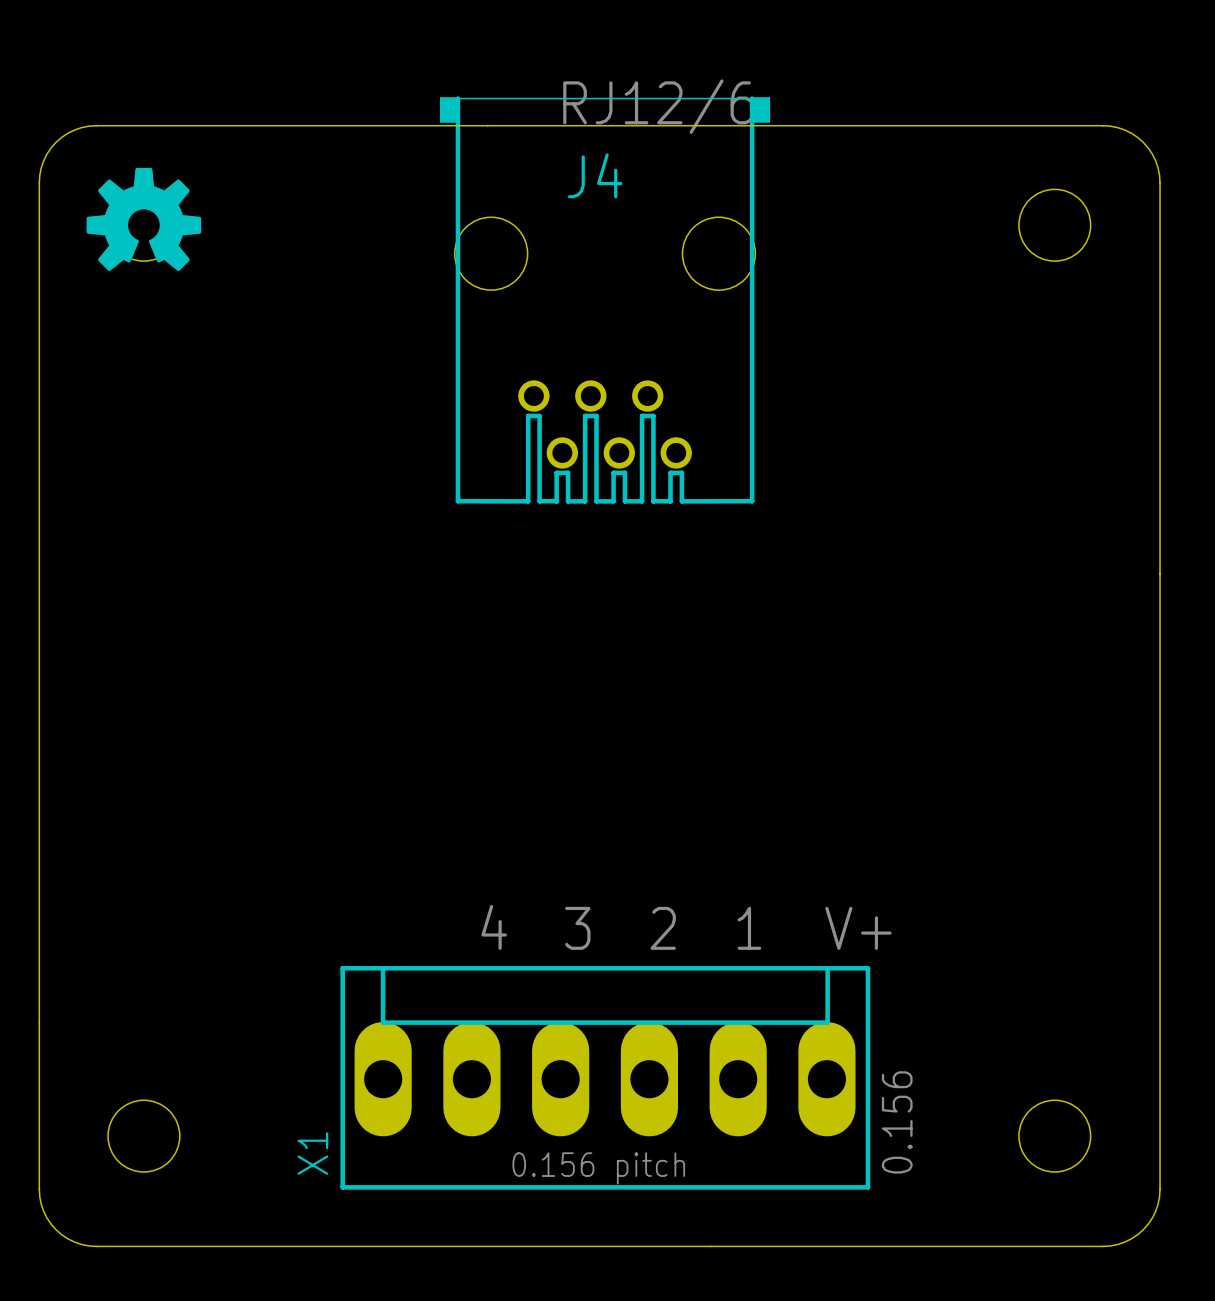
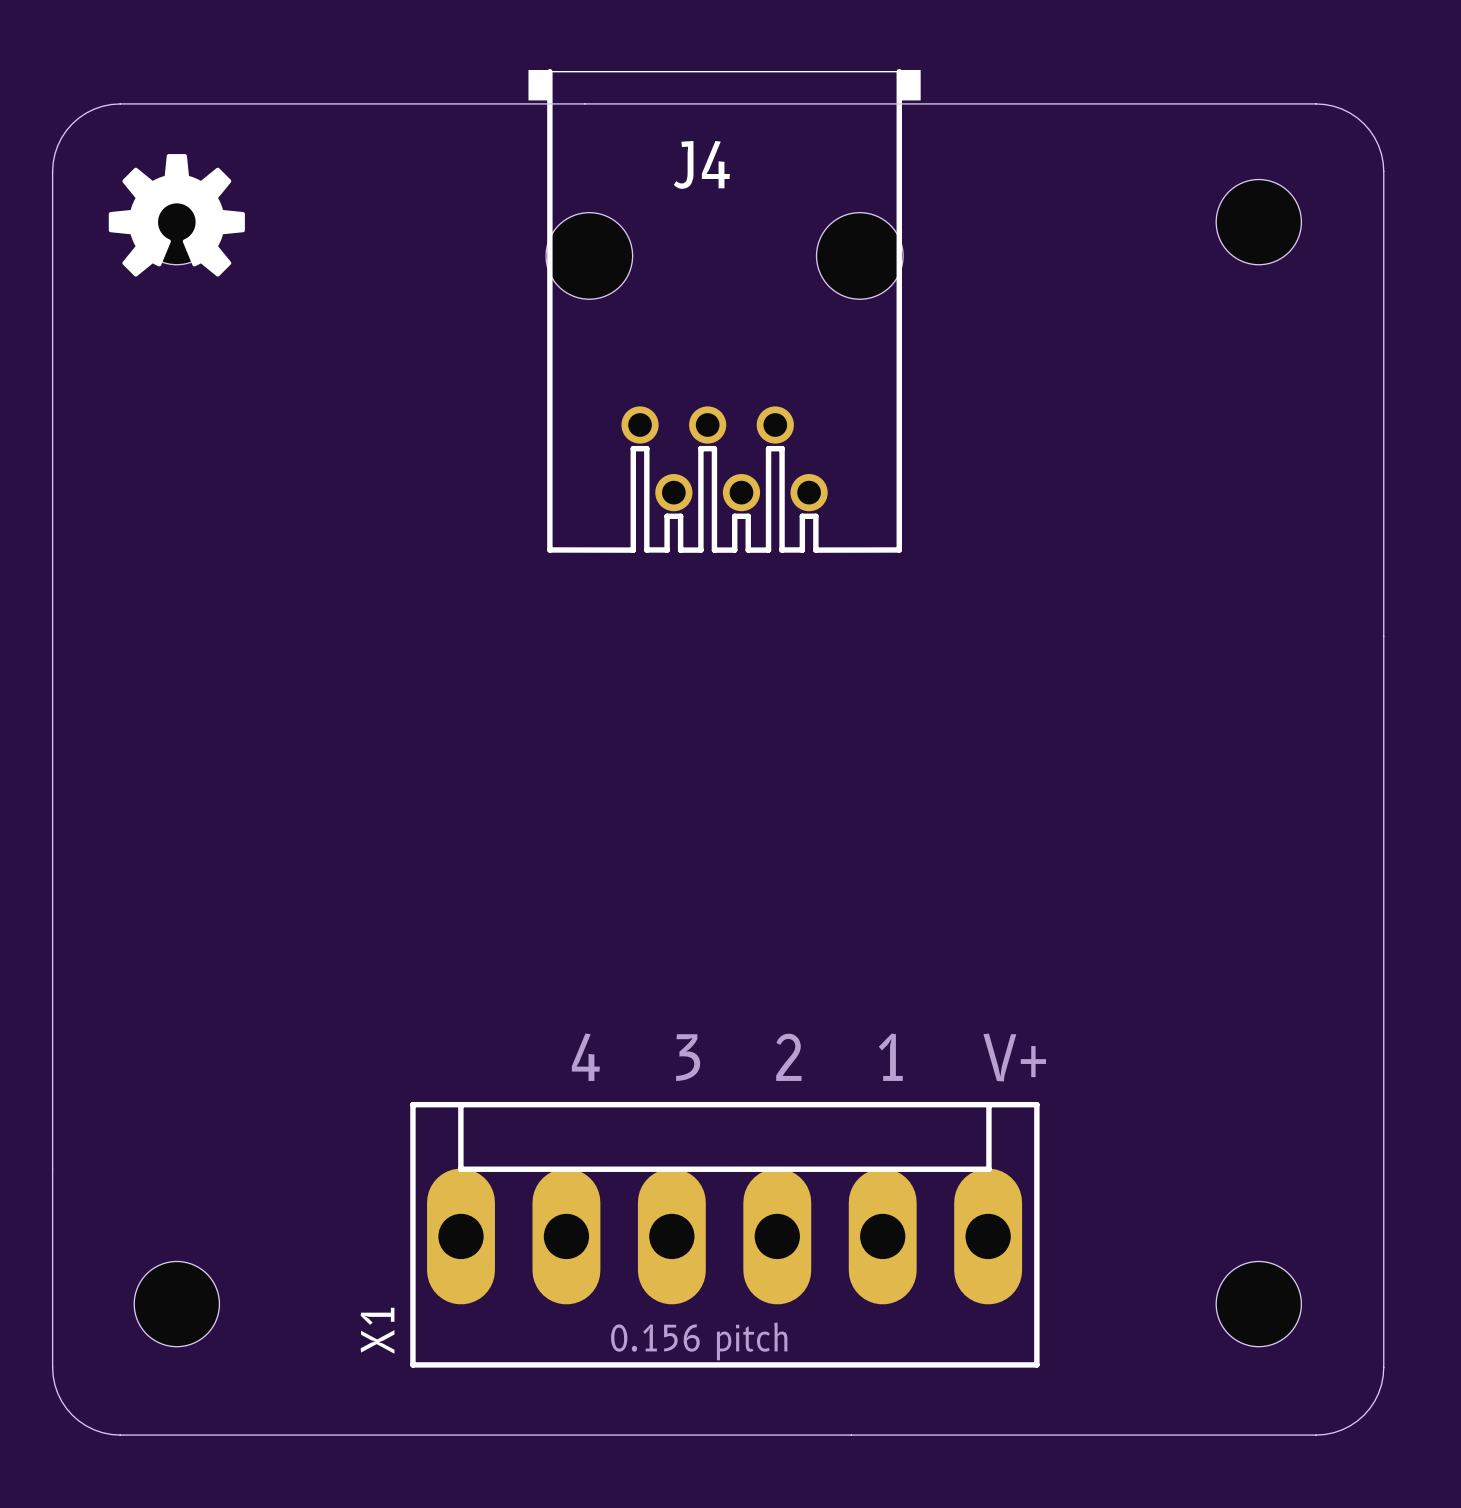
J4 value: RJ12/6 (658, 106) -> none
X1 value: 0.156 (897, 1122) -> none

